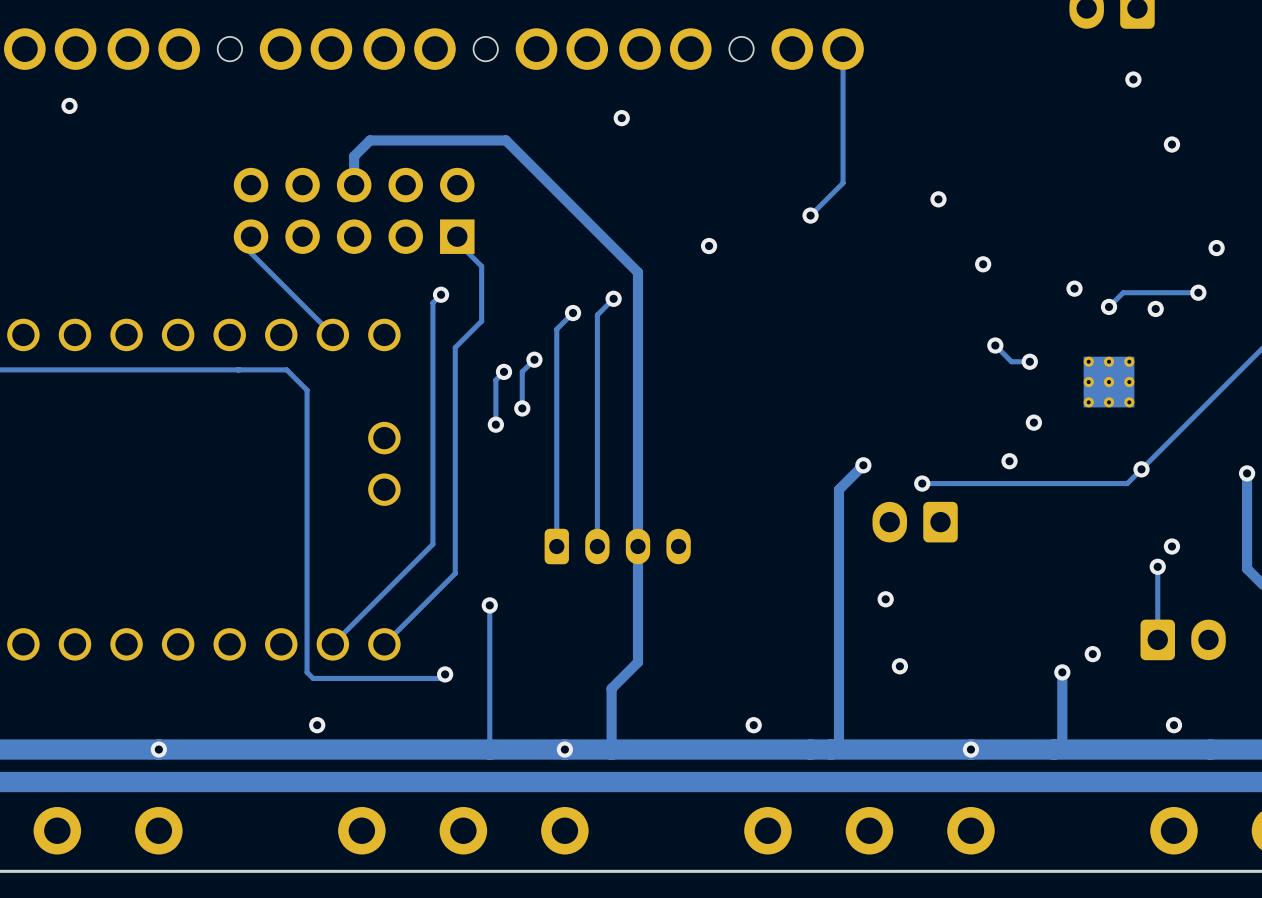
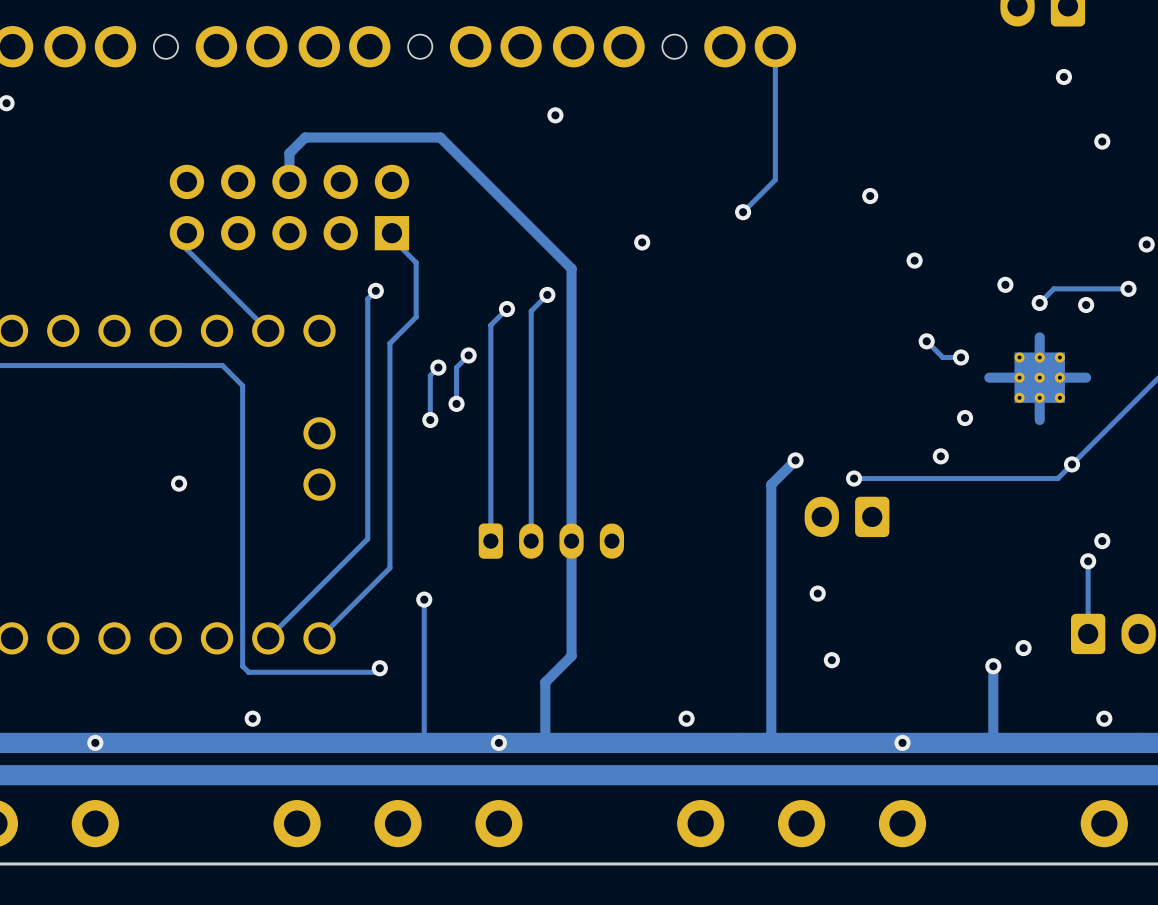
track: none -> (1039, 337) (1039, 420)
track: none -> (1086, 377) (989, 377)
via: none -> (179, 483)

